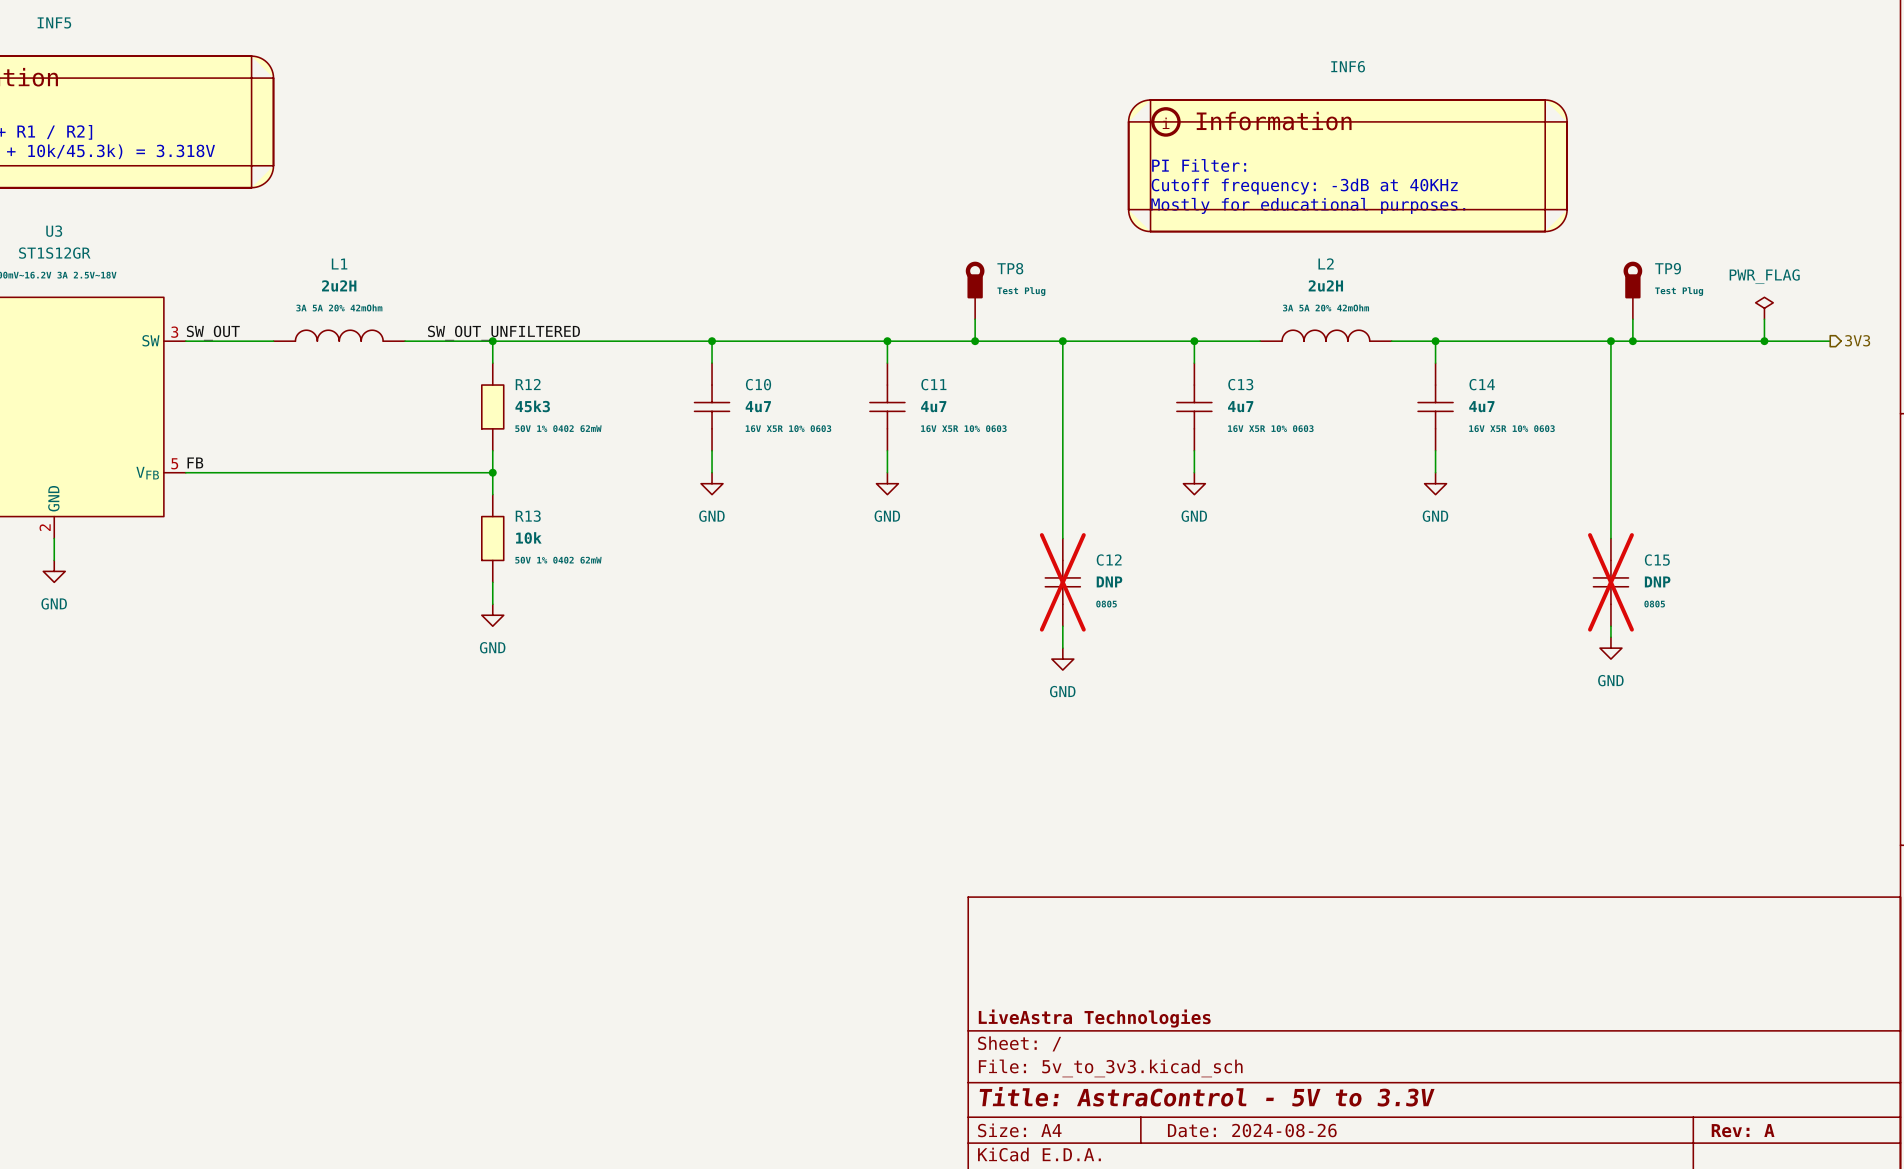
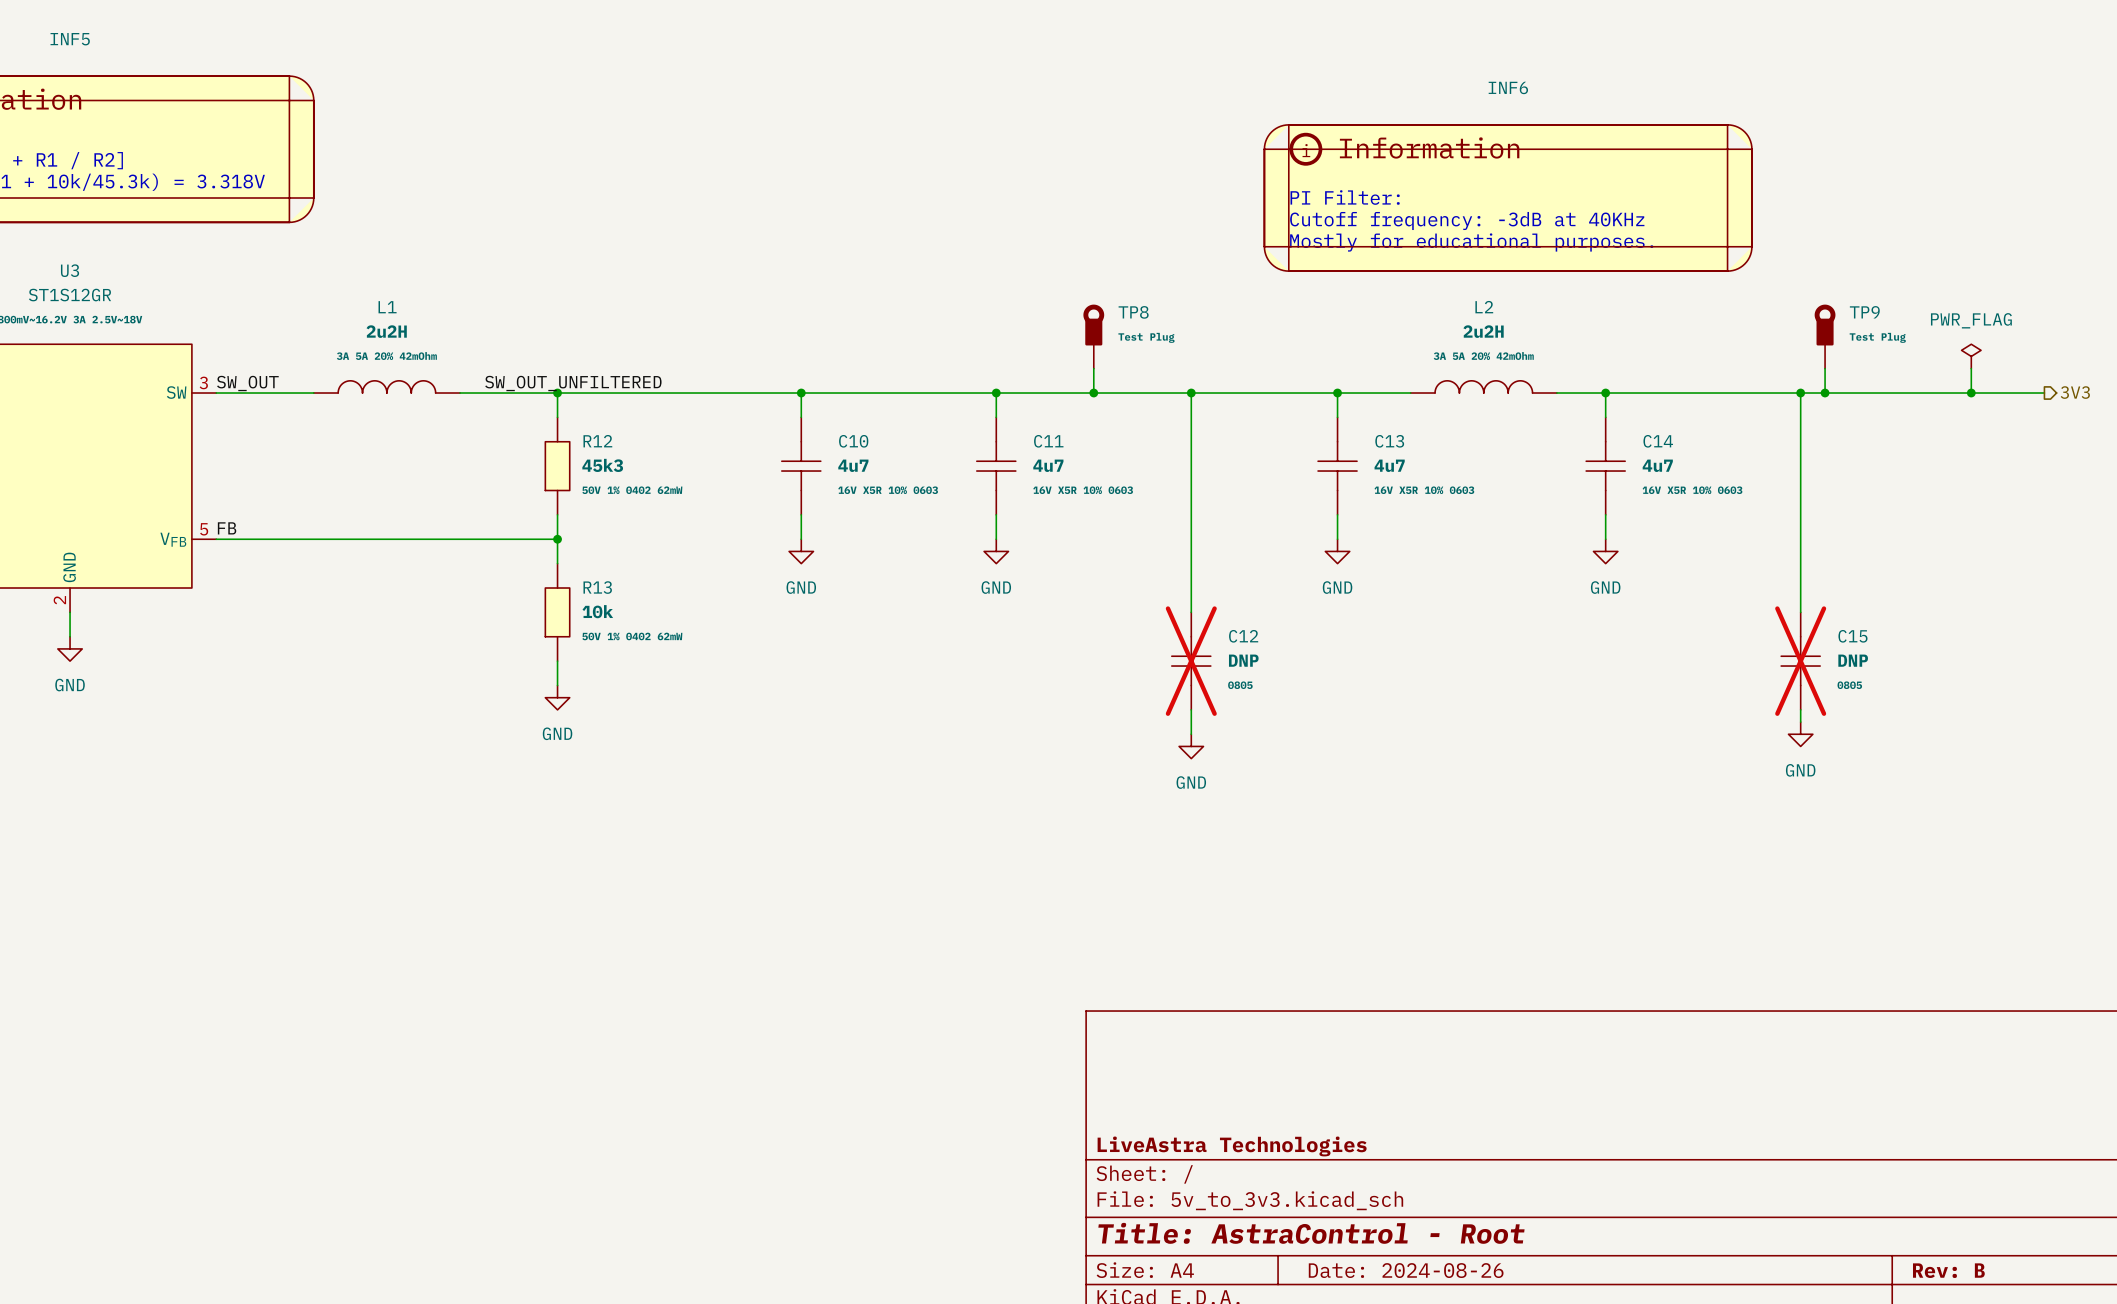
title block: Title: AstraControl - 5V to 3.3V (1207, 1096) -> Title: AstraControl - Root (1311, 1233)
title block: Rev: A (1743, 1130) -> Rev: B (1948, 1270)

